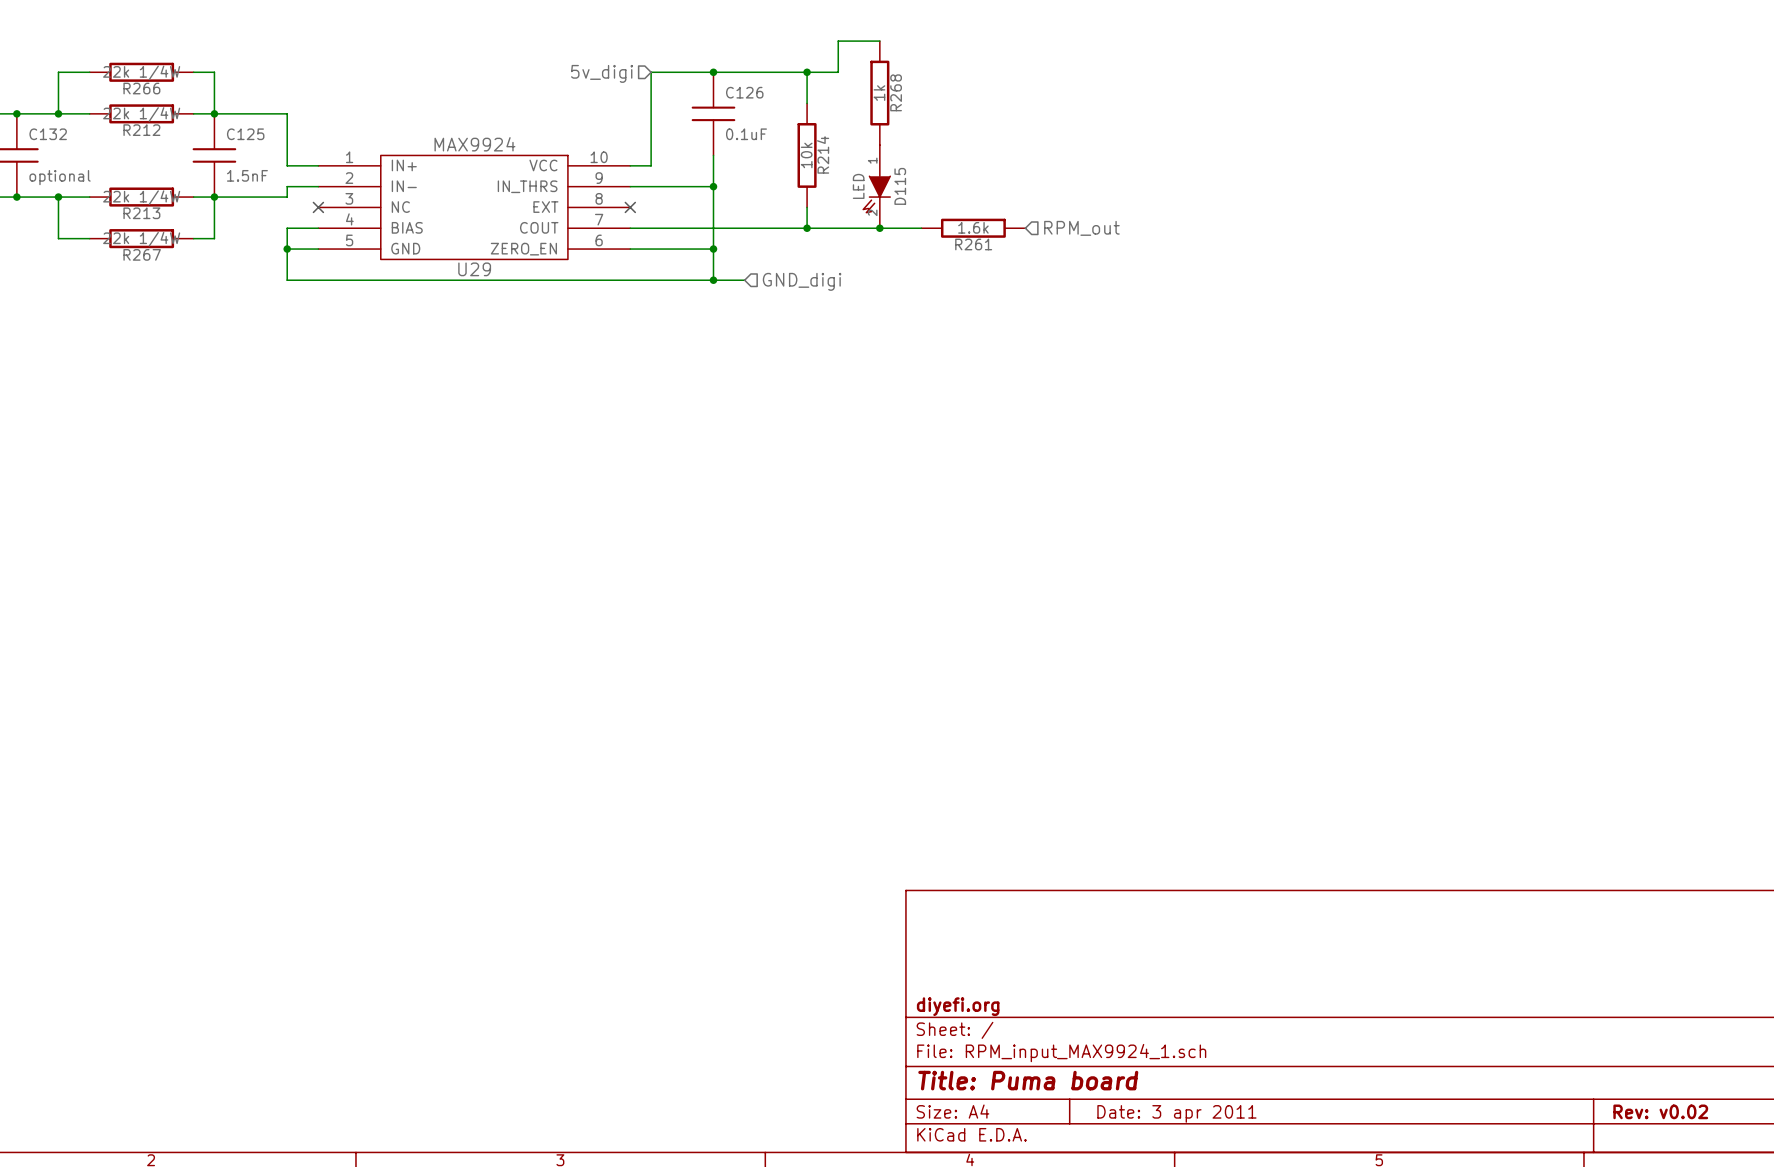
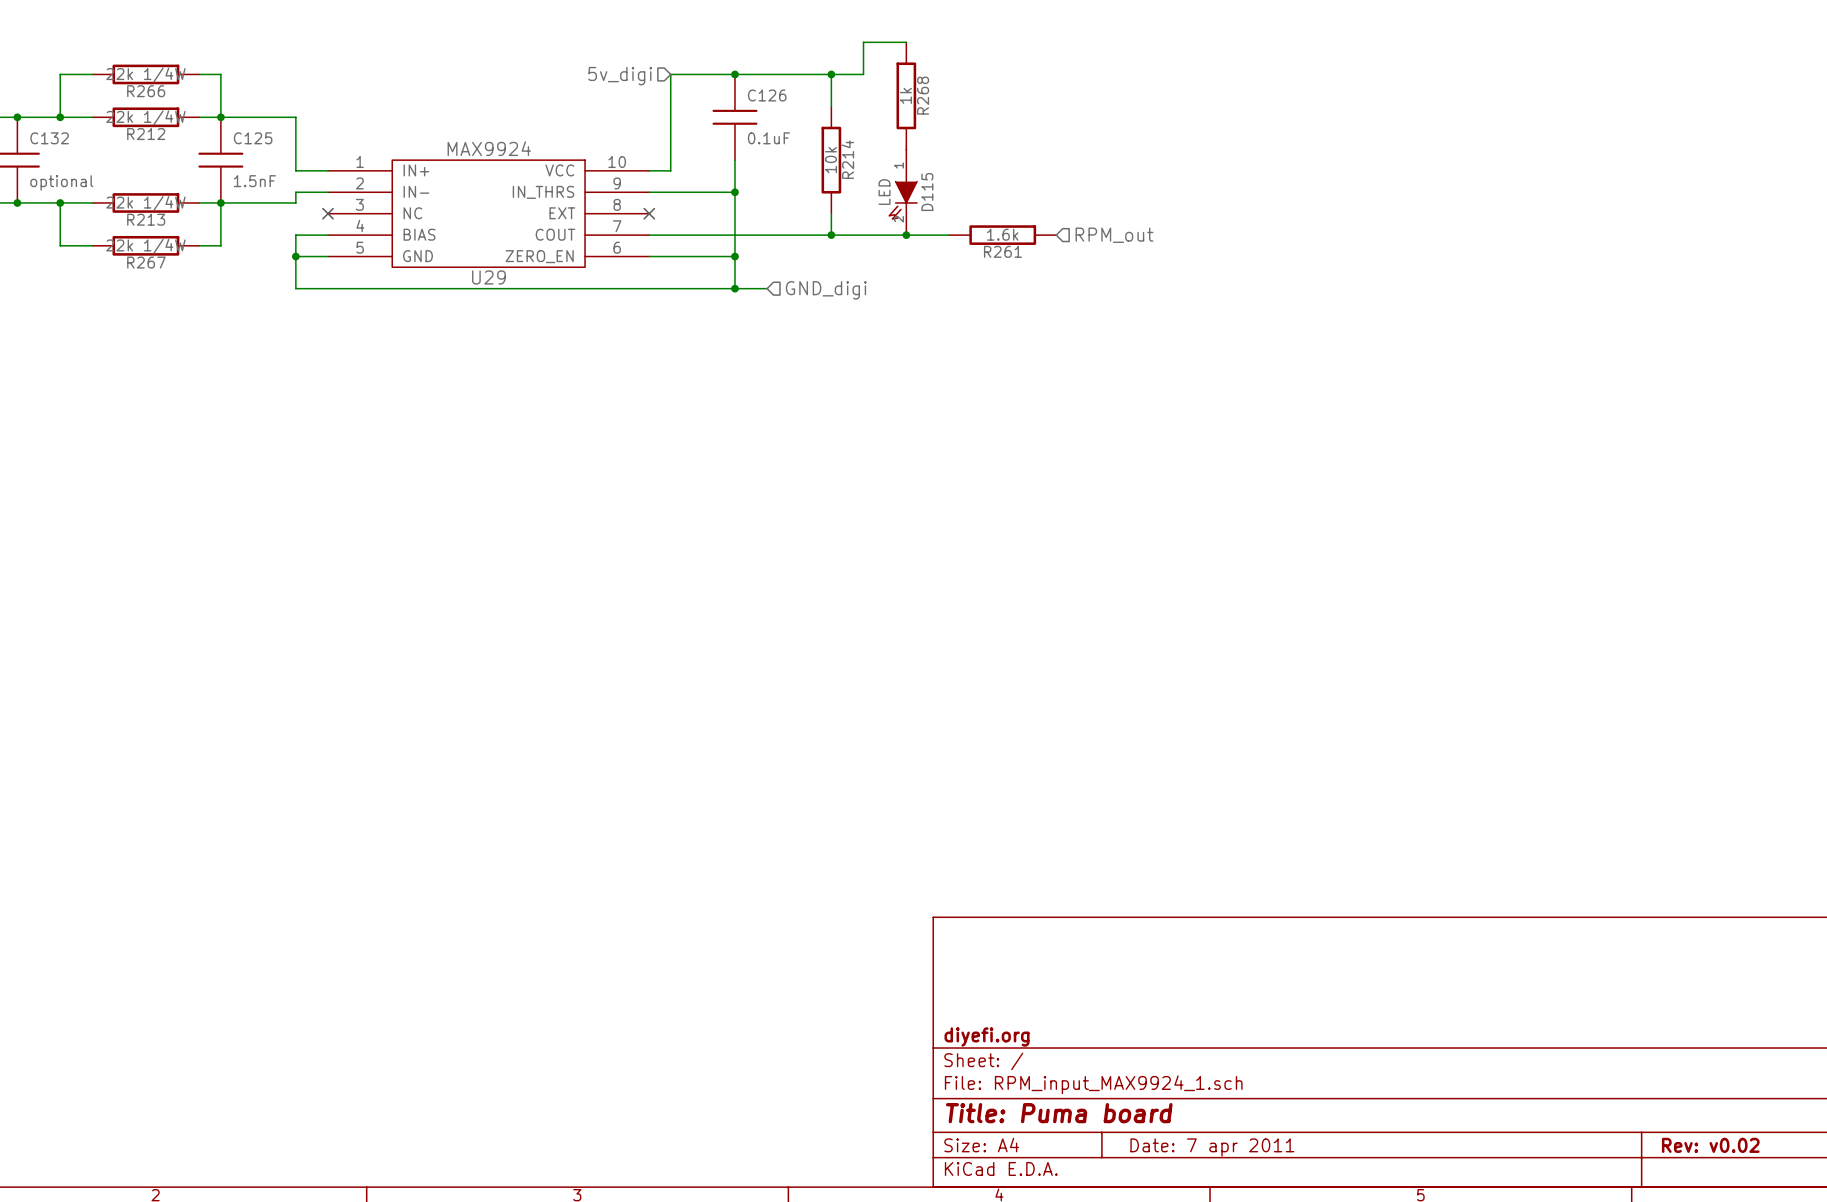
title block: Date: 3 apr 2011 (1176, 1113) -> Date: 7 apr 2011 (1212, 1147)

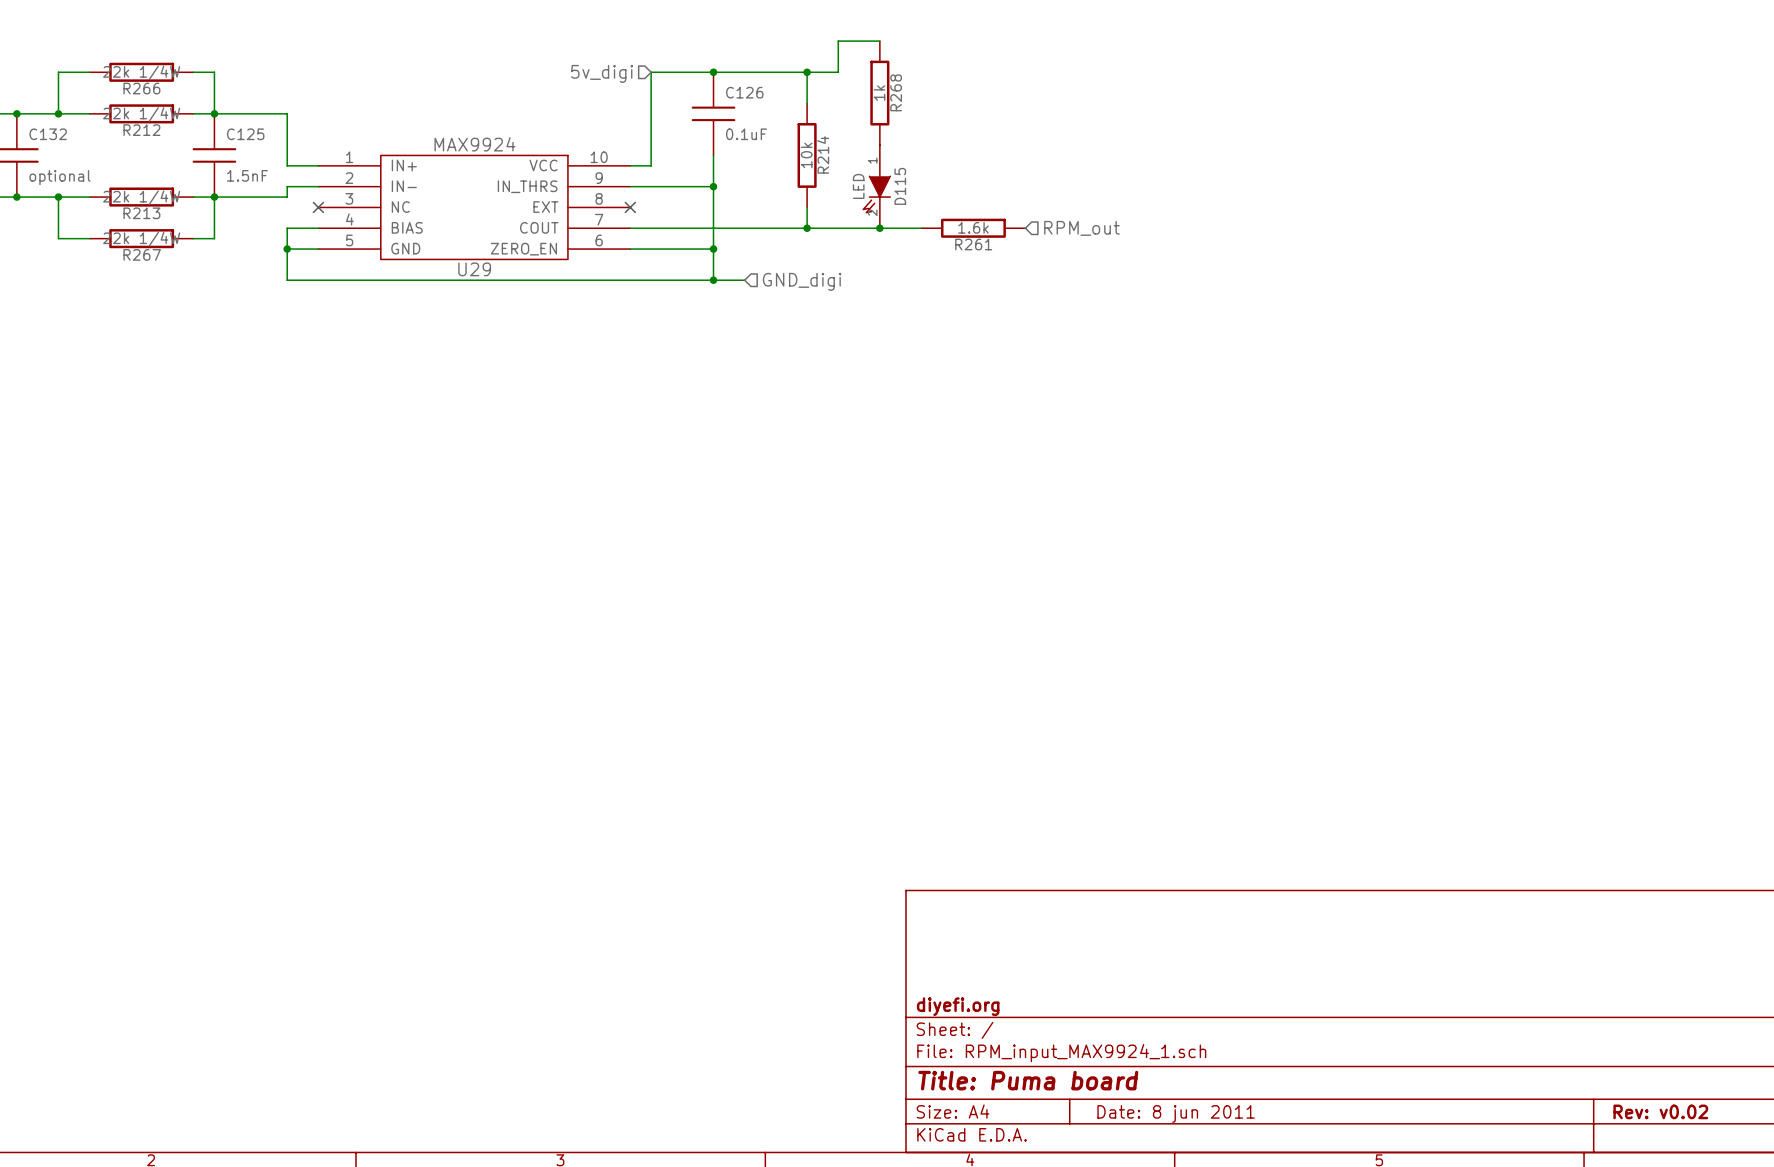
title block: Date: 7 apr 2011 (1212, 1147) -> Date: 8 jun 2011 (1176, 1113)

